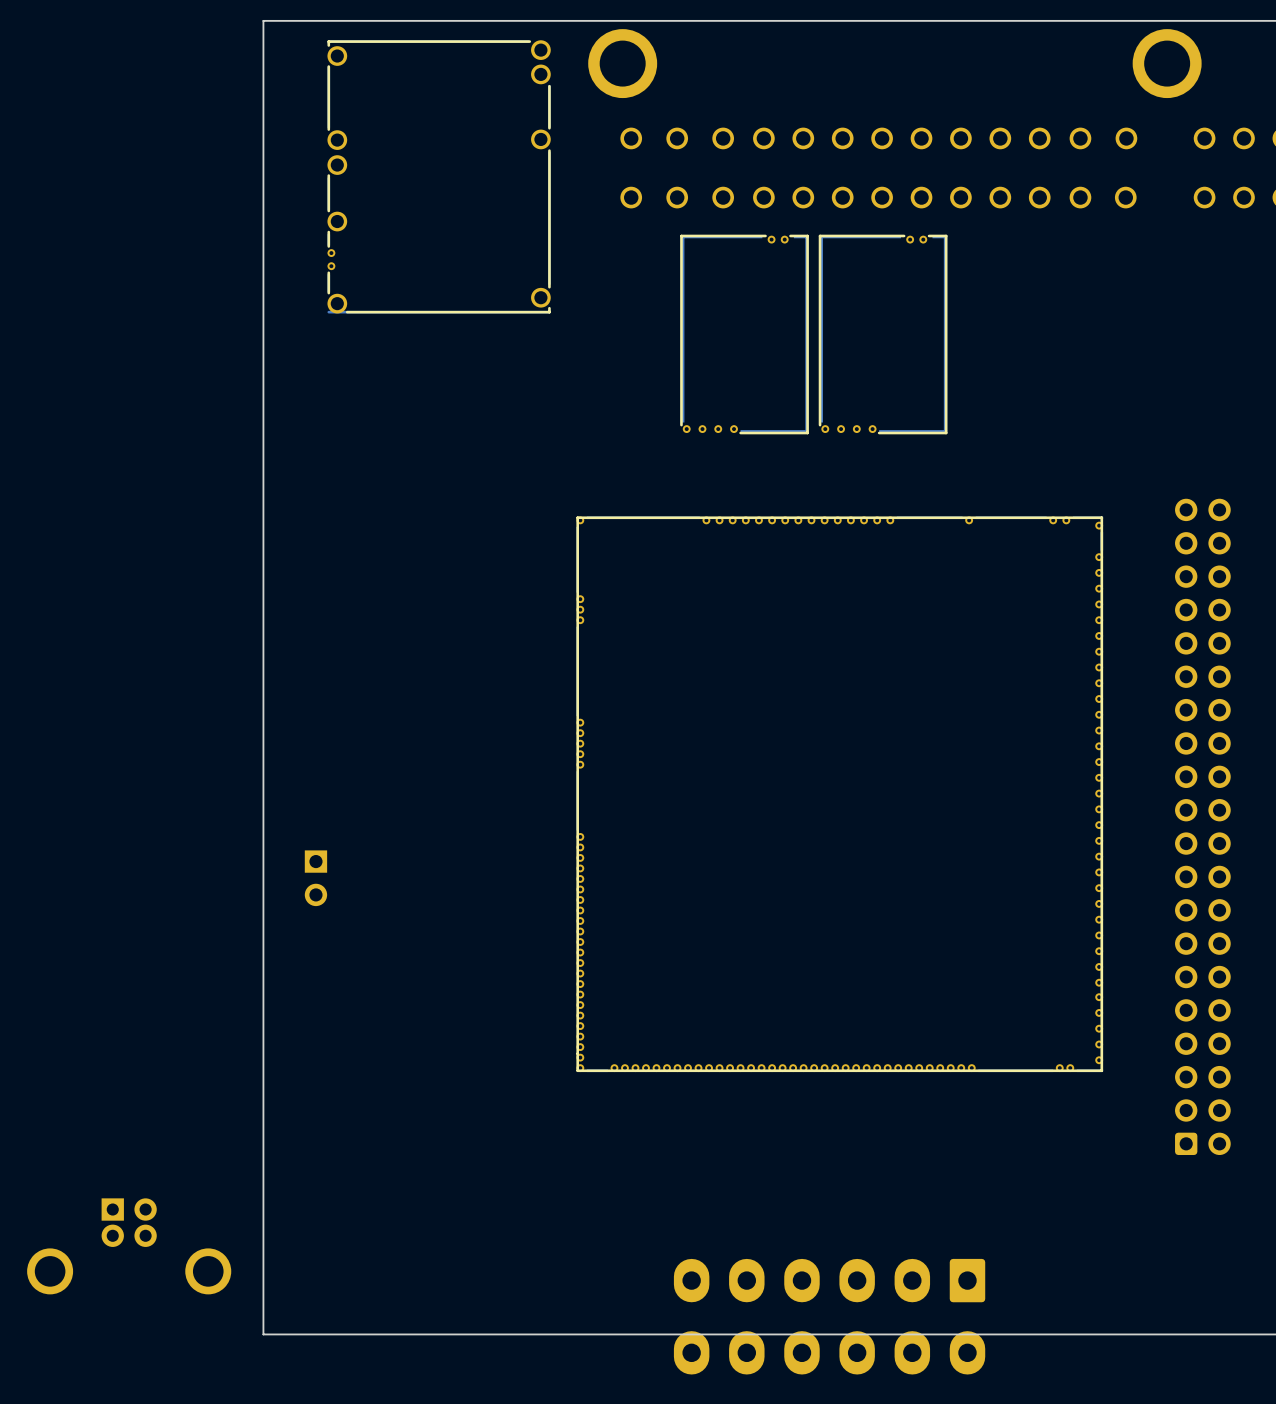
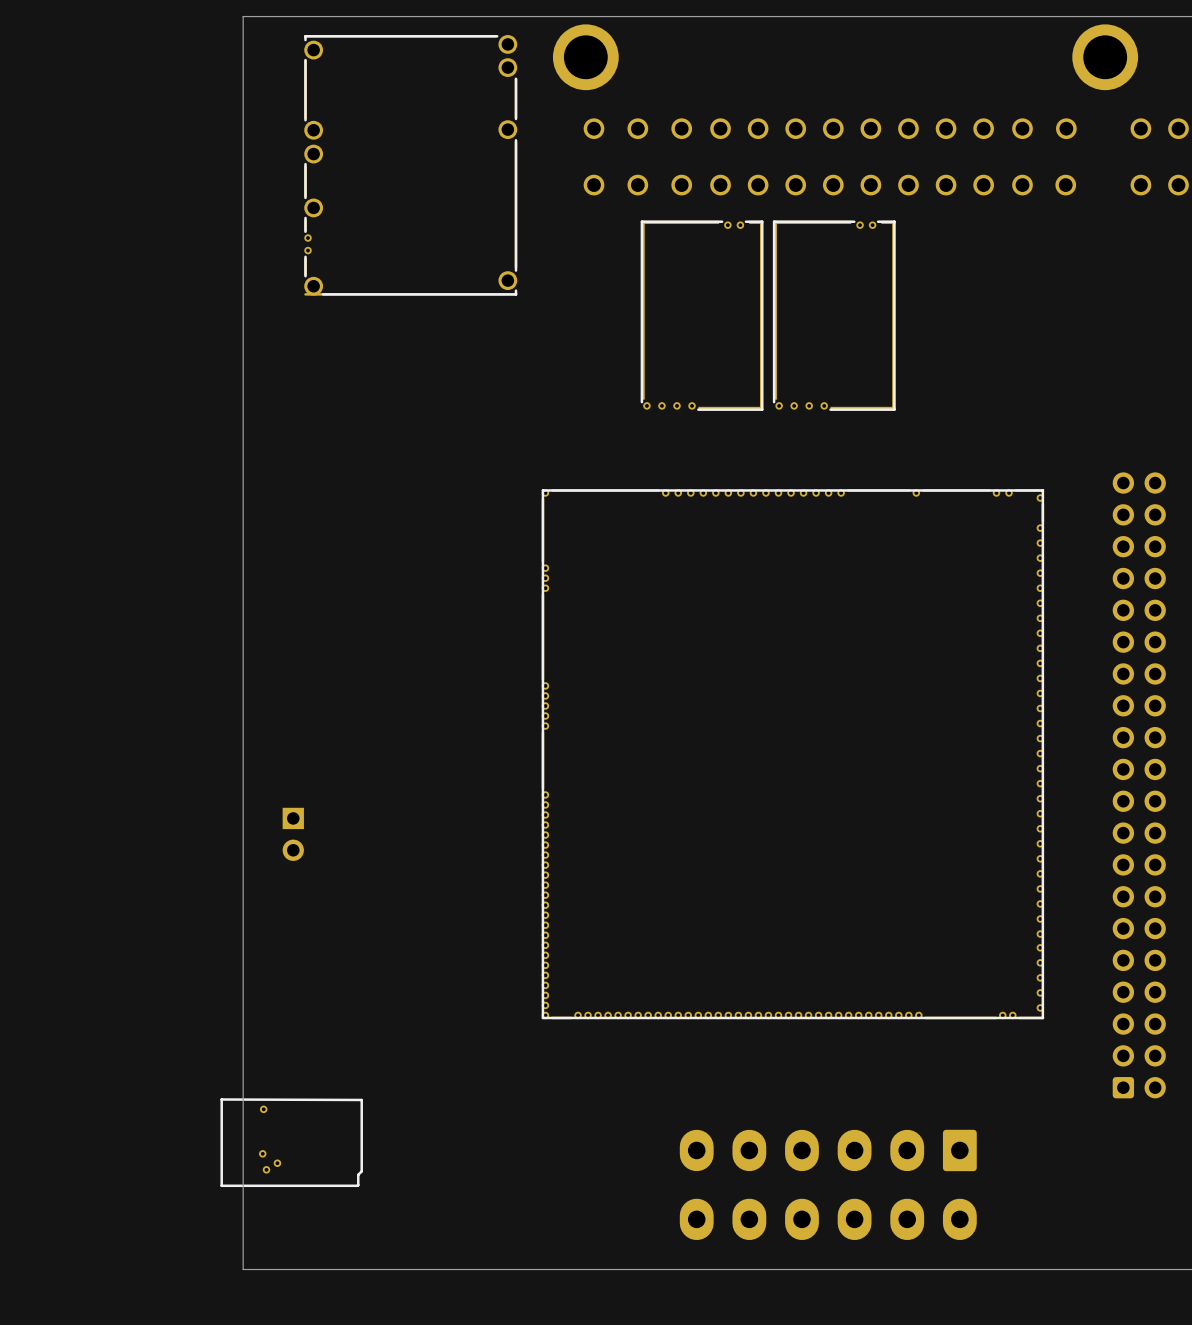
part: none -> (291, 1142)
part: (129, 1246) -> none
part position: (829, 1316) -> (828, 1184)

